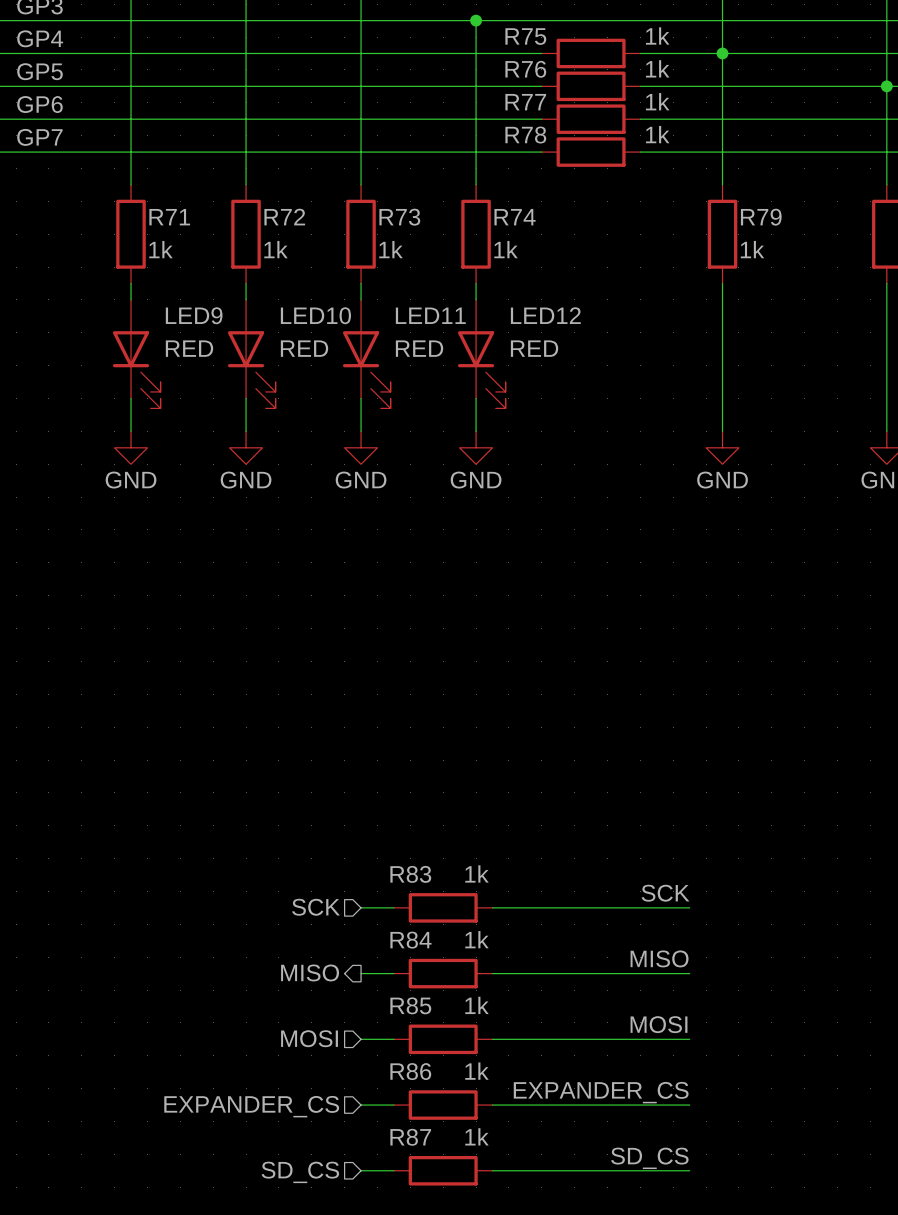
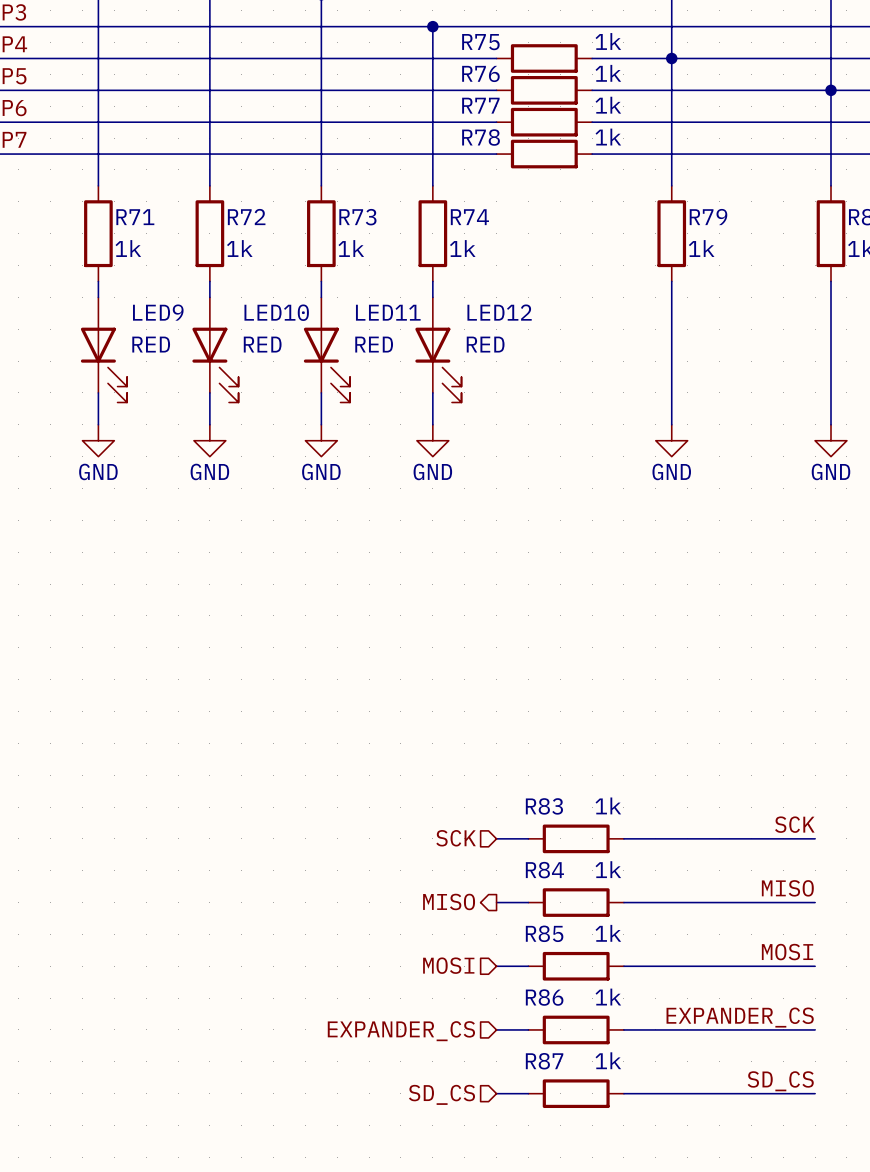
label position: SCK (665, 893) -> SCK (794, 824)
hierarchical label position: SCK (316, 907) -> SCK (456, 838)
wire: (361, 907) (393, 907) -> (496, 838) (528, 838)
R83 position: (443, 907) -> (576, 838)
wire: (492, 907) (689, 907) -> (623, 838) (815, 838)
label position: MISO (659, 958) -> MISO (787, 888)
hierarchical label position: MISO (310, 972) -> MISO (449, 901)
wire: (361, 973) (393, 973) -> (496, 902) (528, 902)
R84 position: (443, 973) -> (576, 902)
wire: (492, 973) (689, 973) -> (623, 902) (815, 902)
label position: MOSI (659, 1024) -> MOSI (787, 952)
hierarchical label position: MOSI (309, 1038) -> MOSI (448, 965)
wire: (361, 1039) (393, 1039) -> (496, 966) (528, 966)
R85 position: (443, 1039) -> (576, 966)
wire: (492, 1039) (689, 1039) -> (623, 966) (815, 966)
label position: EXPANDER_CS (601, 1092) -> EXPANDER_CS (740, 1017)
wire: (361, 1105) (393, 1105) -> (496, 1029) (528, 1029)
R86 position: (443, 1105) -> (576, 1029)
wire: (492, 1105) (689, 1105) -> (623, 1029) (815, 1029)
hierarchical label position: EXPANDER_CS (251, 1106) -> EXPANDER_CS (401, 1031)
label position: SD_CS (649, 1158) -> SD_CS (780, 1081)
wire: (361, 1170) (393, 1170) -> (496, 1093) (528, 1093)
R87 position: (443, 1170) -> (576, 1093)
wire: (492, 1170) (689, 1170) -> (623, 1093) (815, 1093)
hierarchical label position: SD_CS (300, 1172) -> SD_CS (441, 1094)

